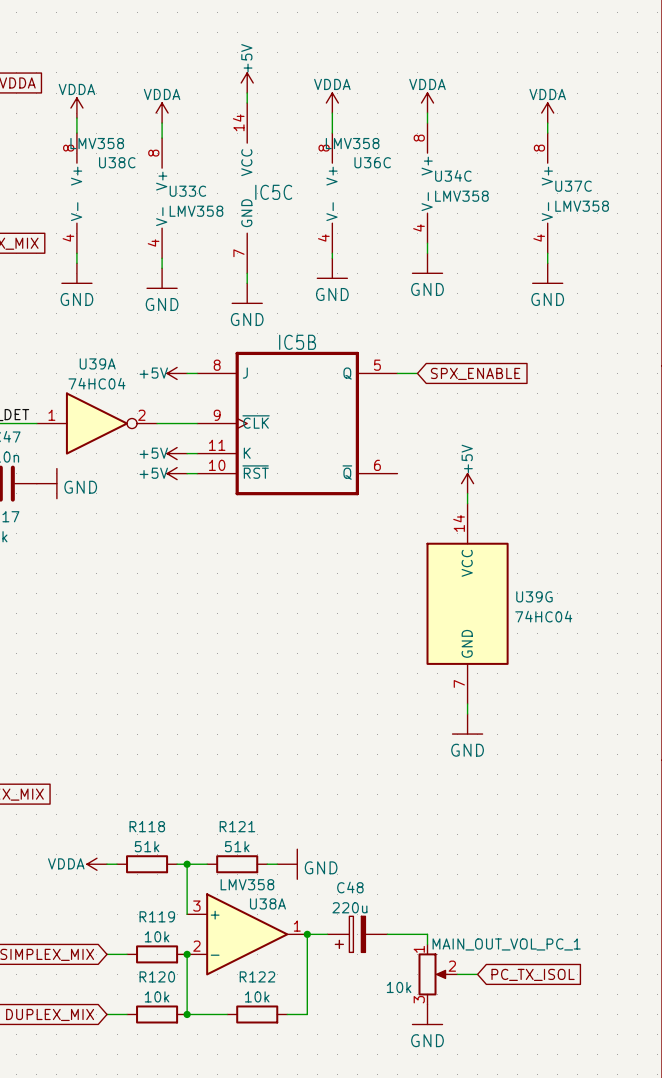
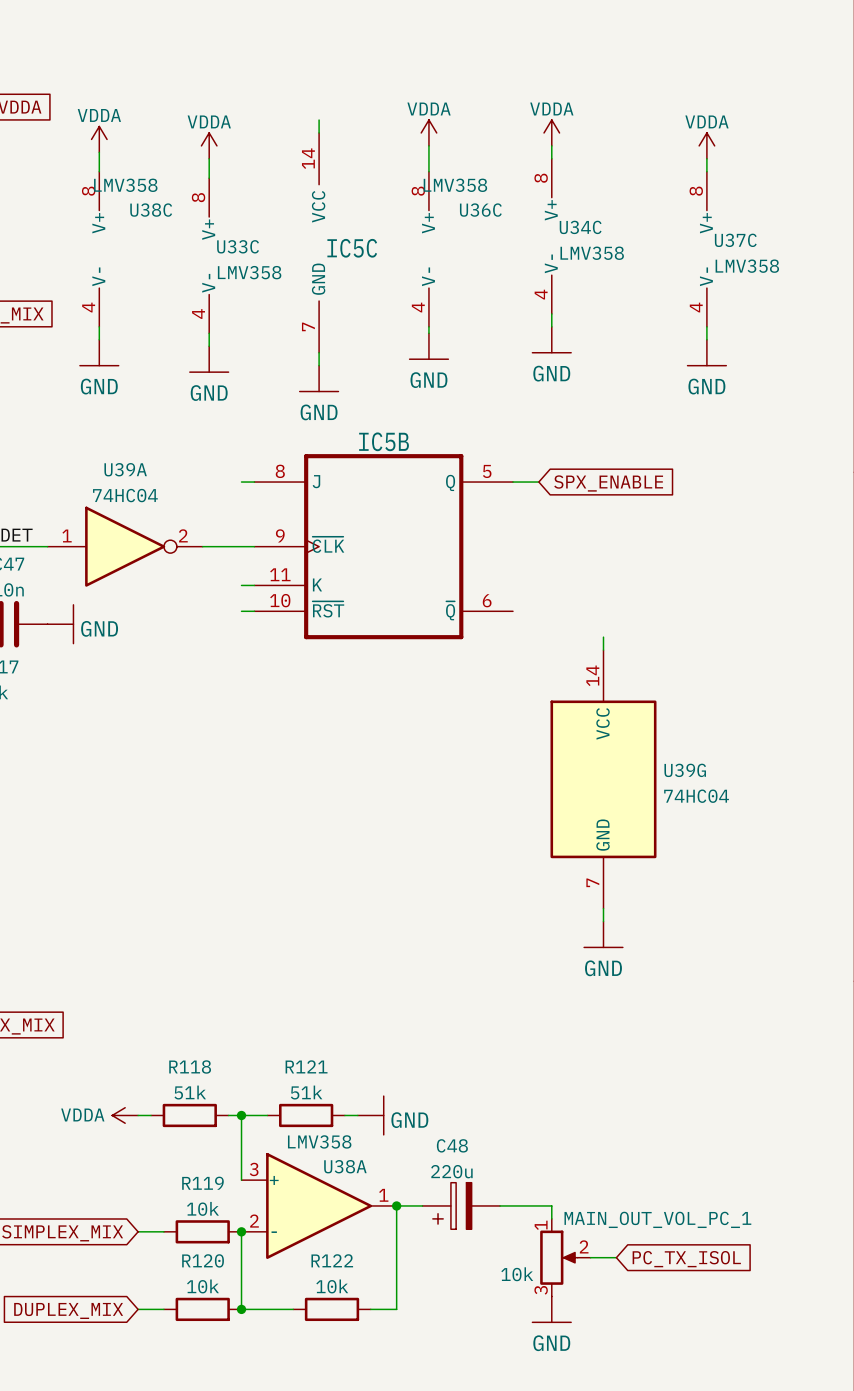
power symbol: +5V (247, 82) -> none
power symbol: +5V (177, 373) -> none
power symbol: +5V (177, 453) -> none
power symbol: +5V (177, 473) -> none
power symbol: +5V (467, 483) -> none

